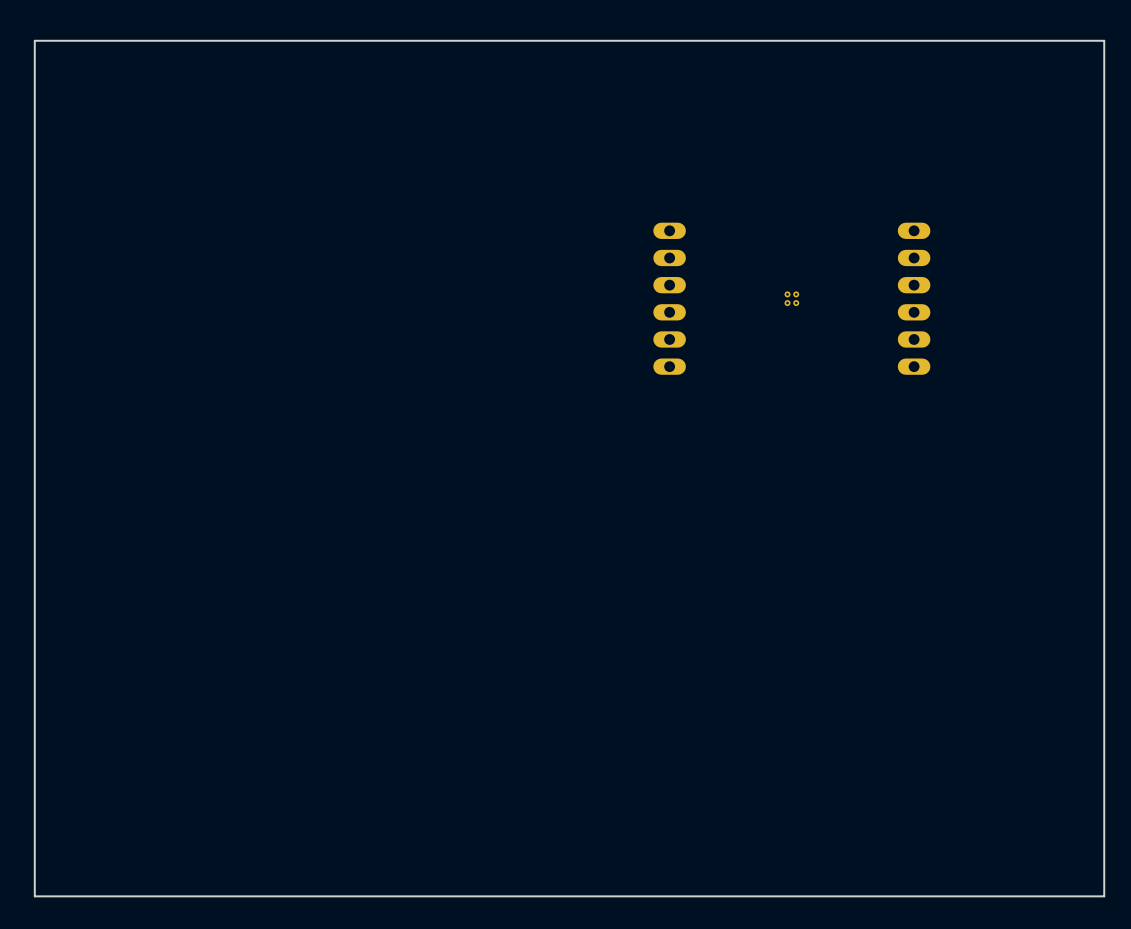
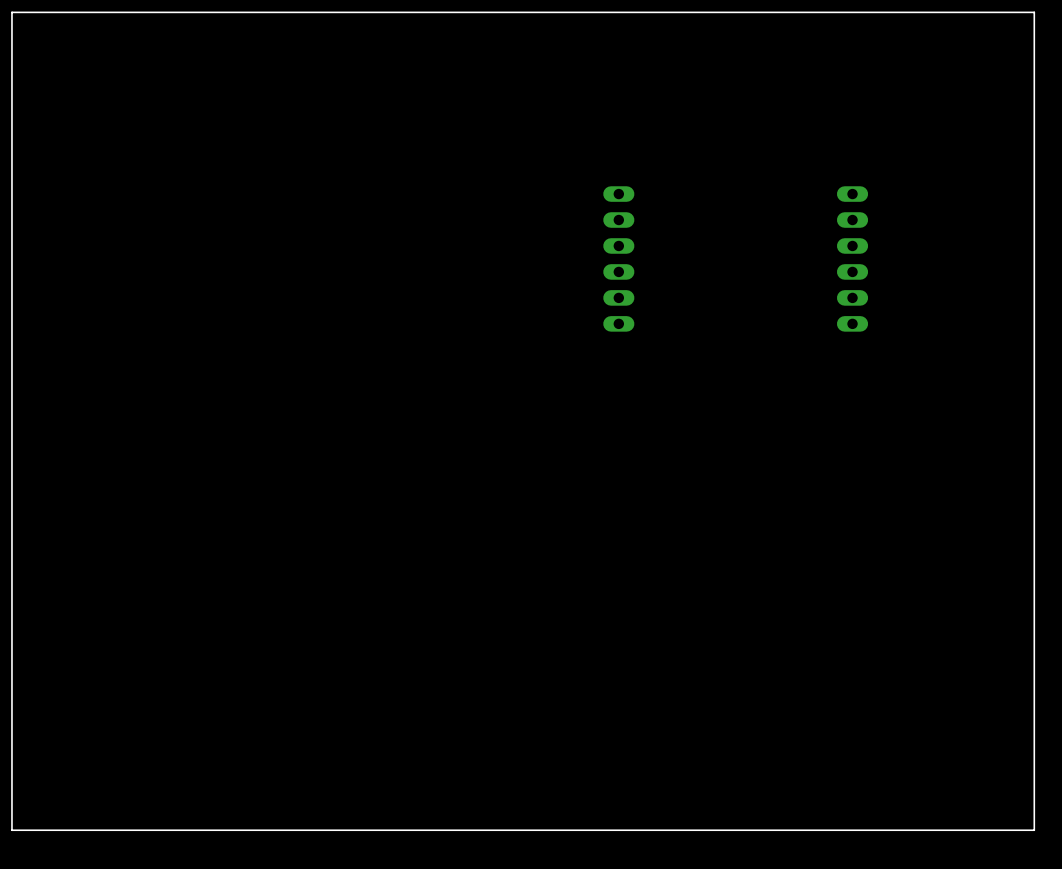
part: (791, 298) -> none

